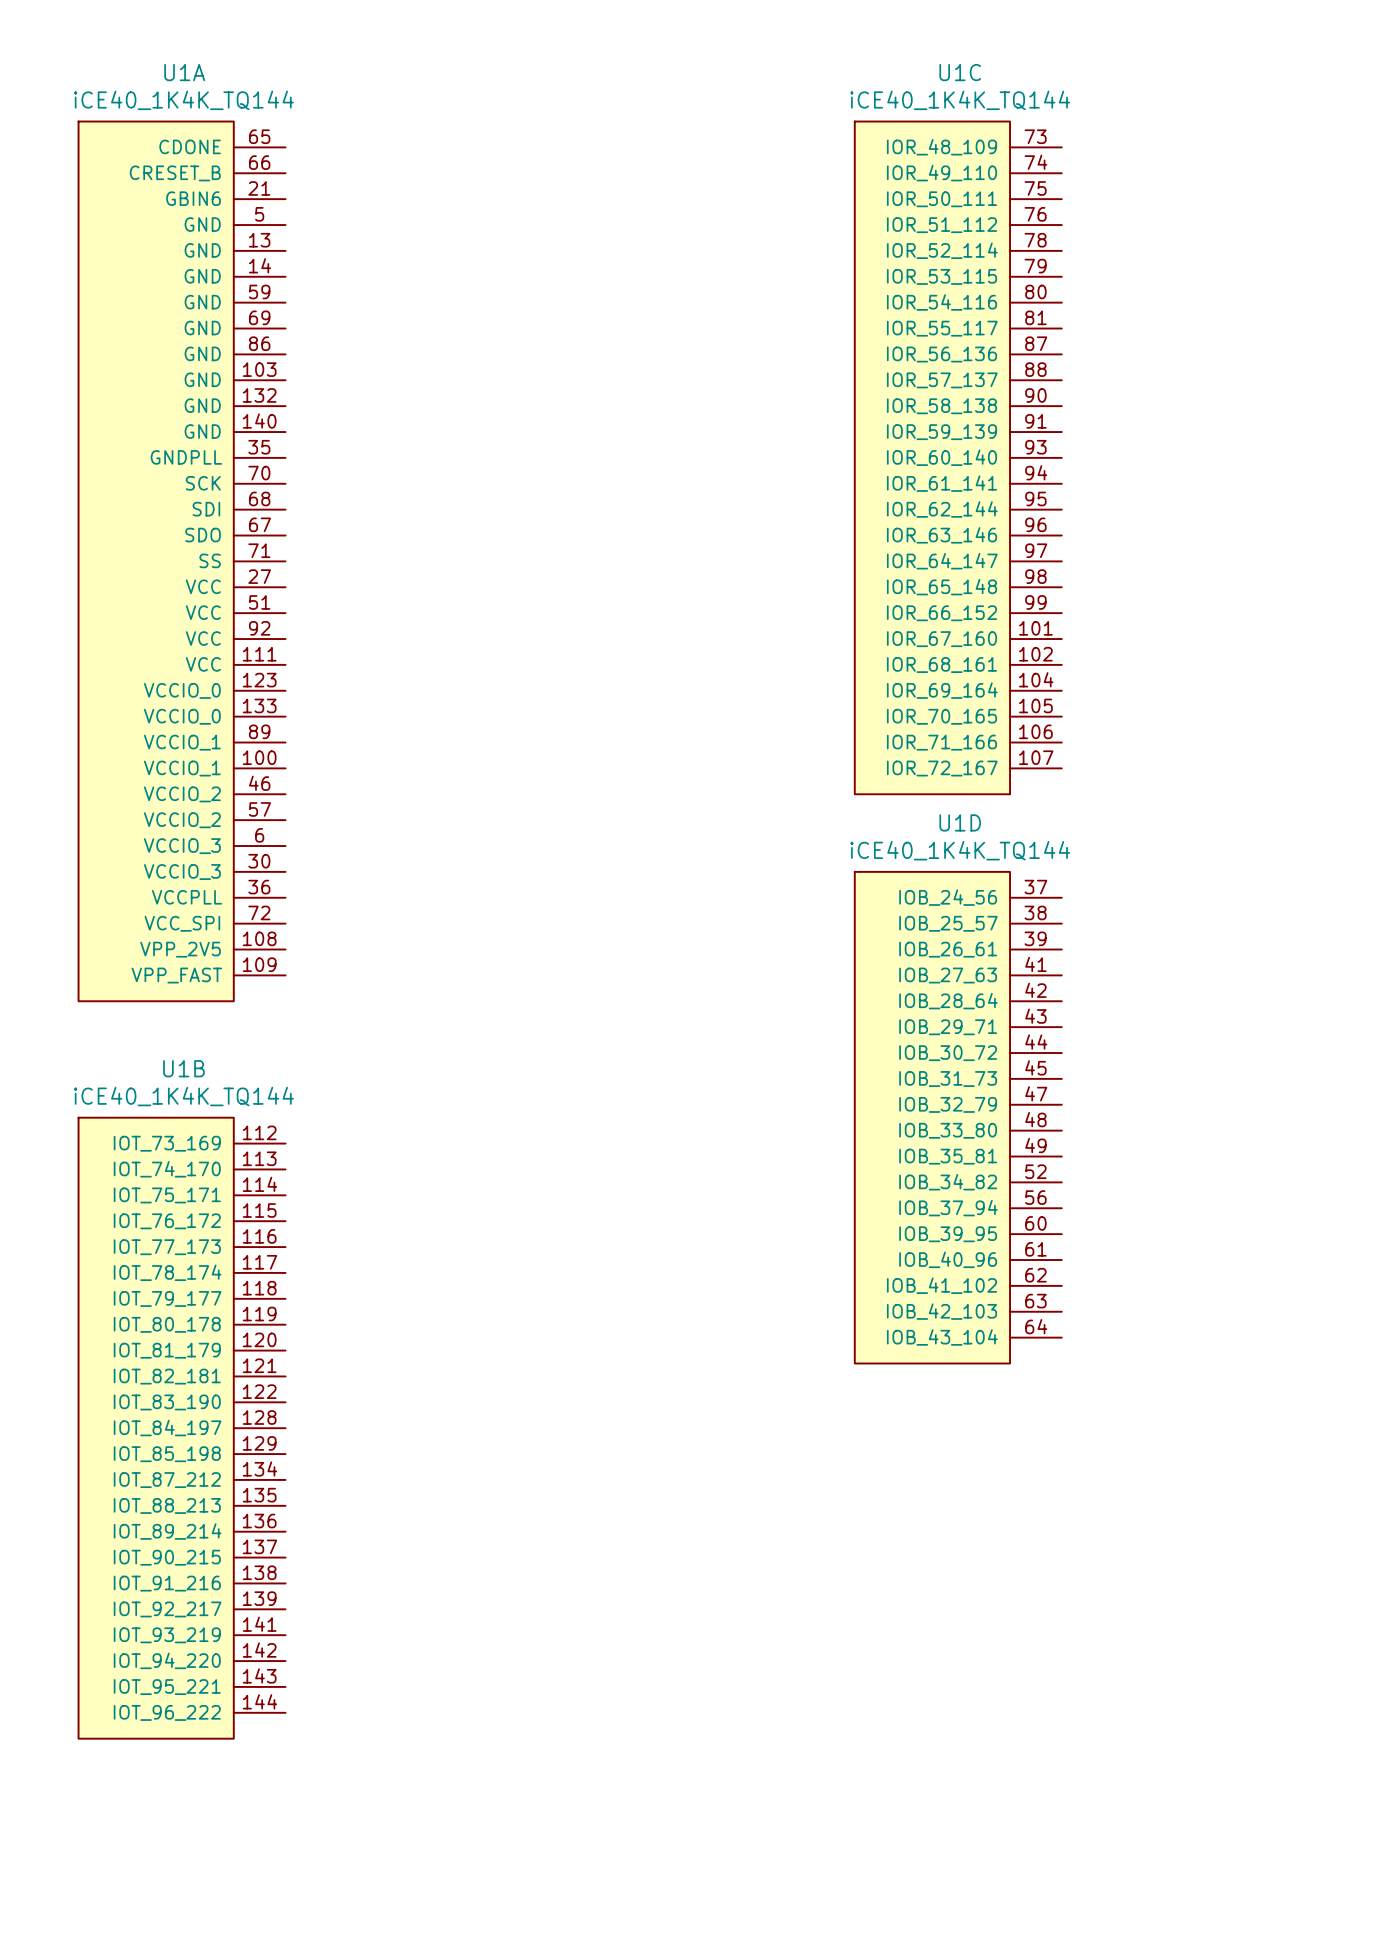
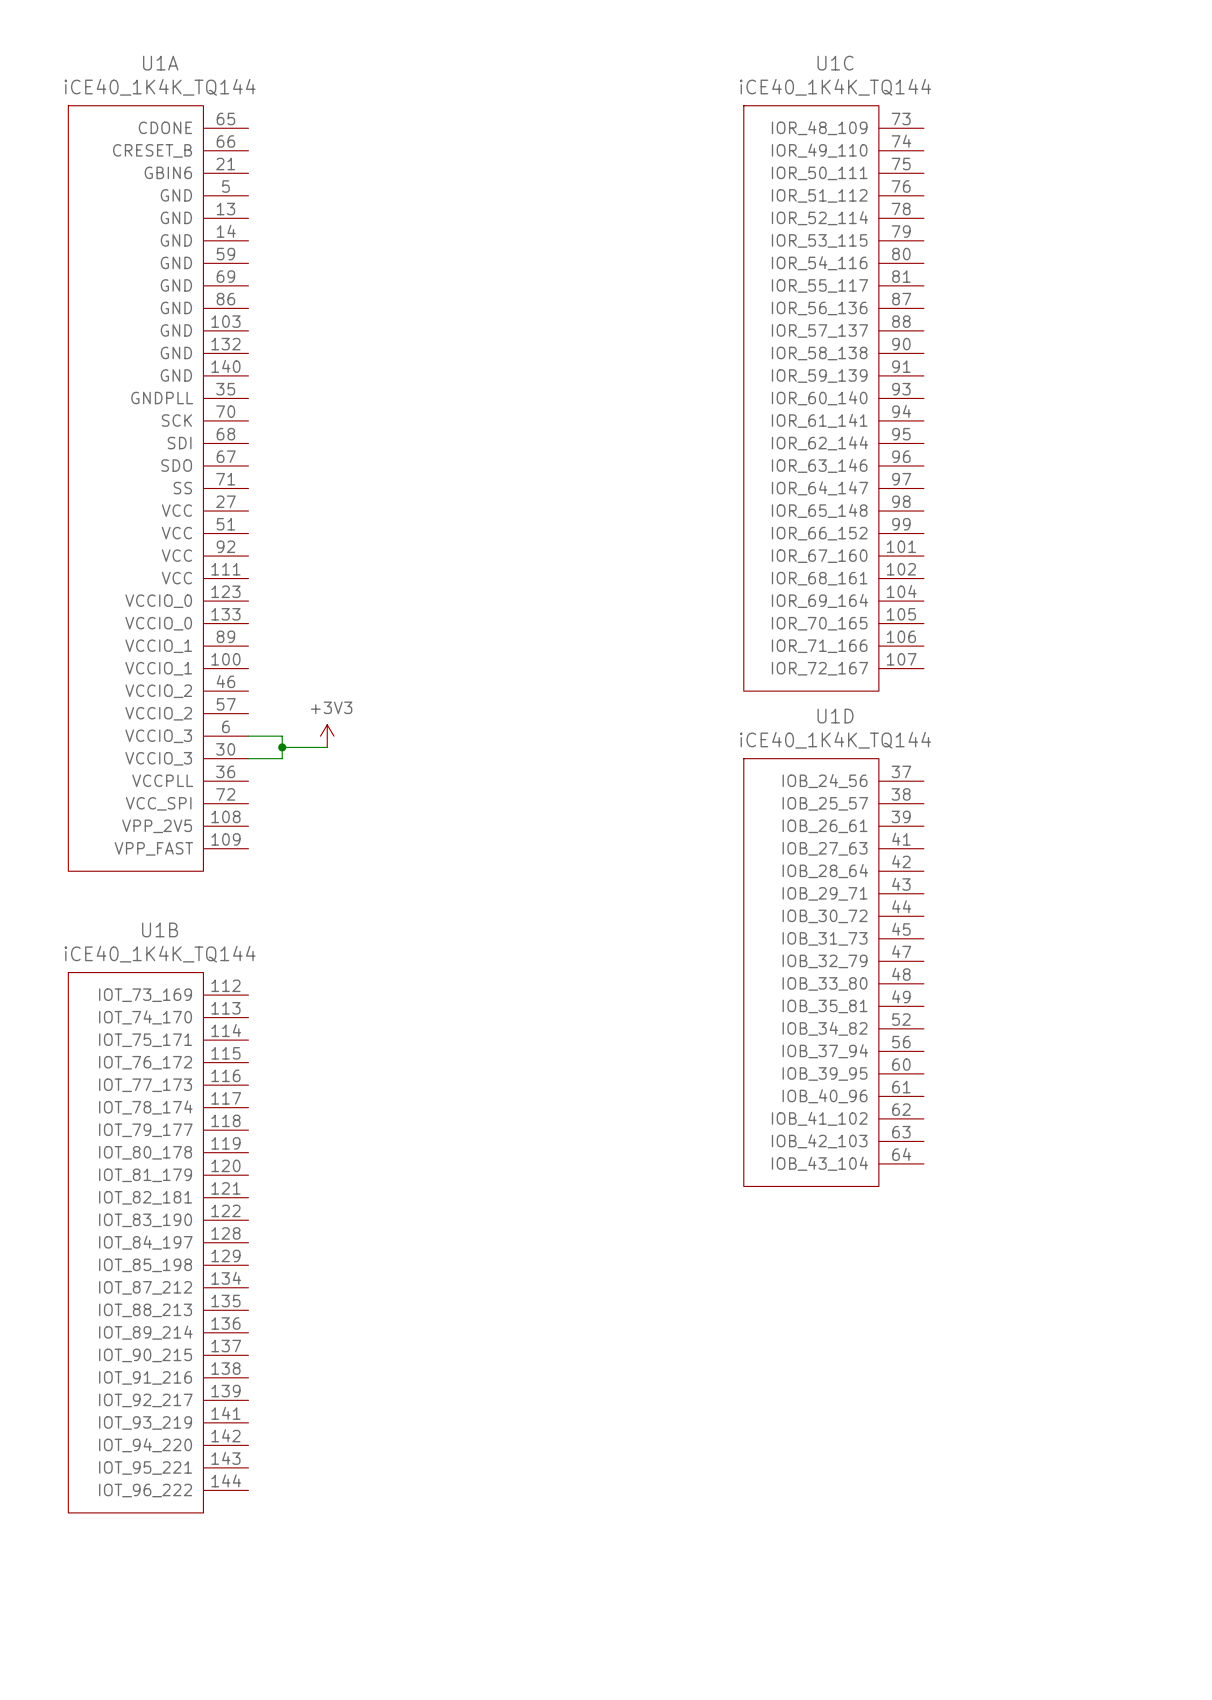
wire: none -> (248, 736) (282, 736) (282, 758) (248, 758)
power symbol: none -> +3V3 (327, 736)
wire: none -> (282, 747) (327, 747)
junction: none -> (282, 747)

